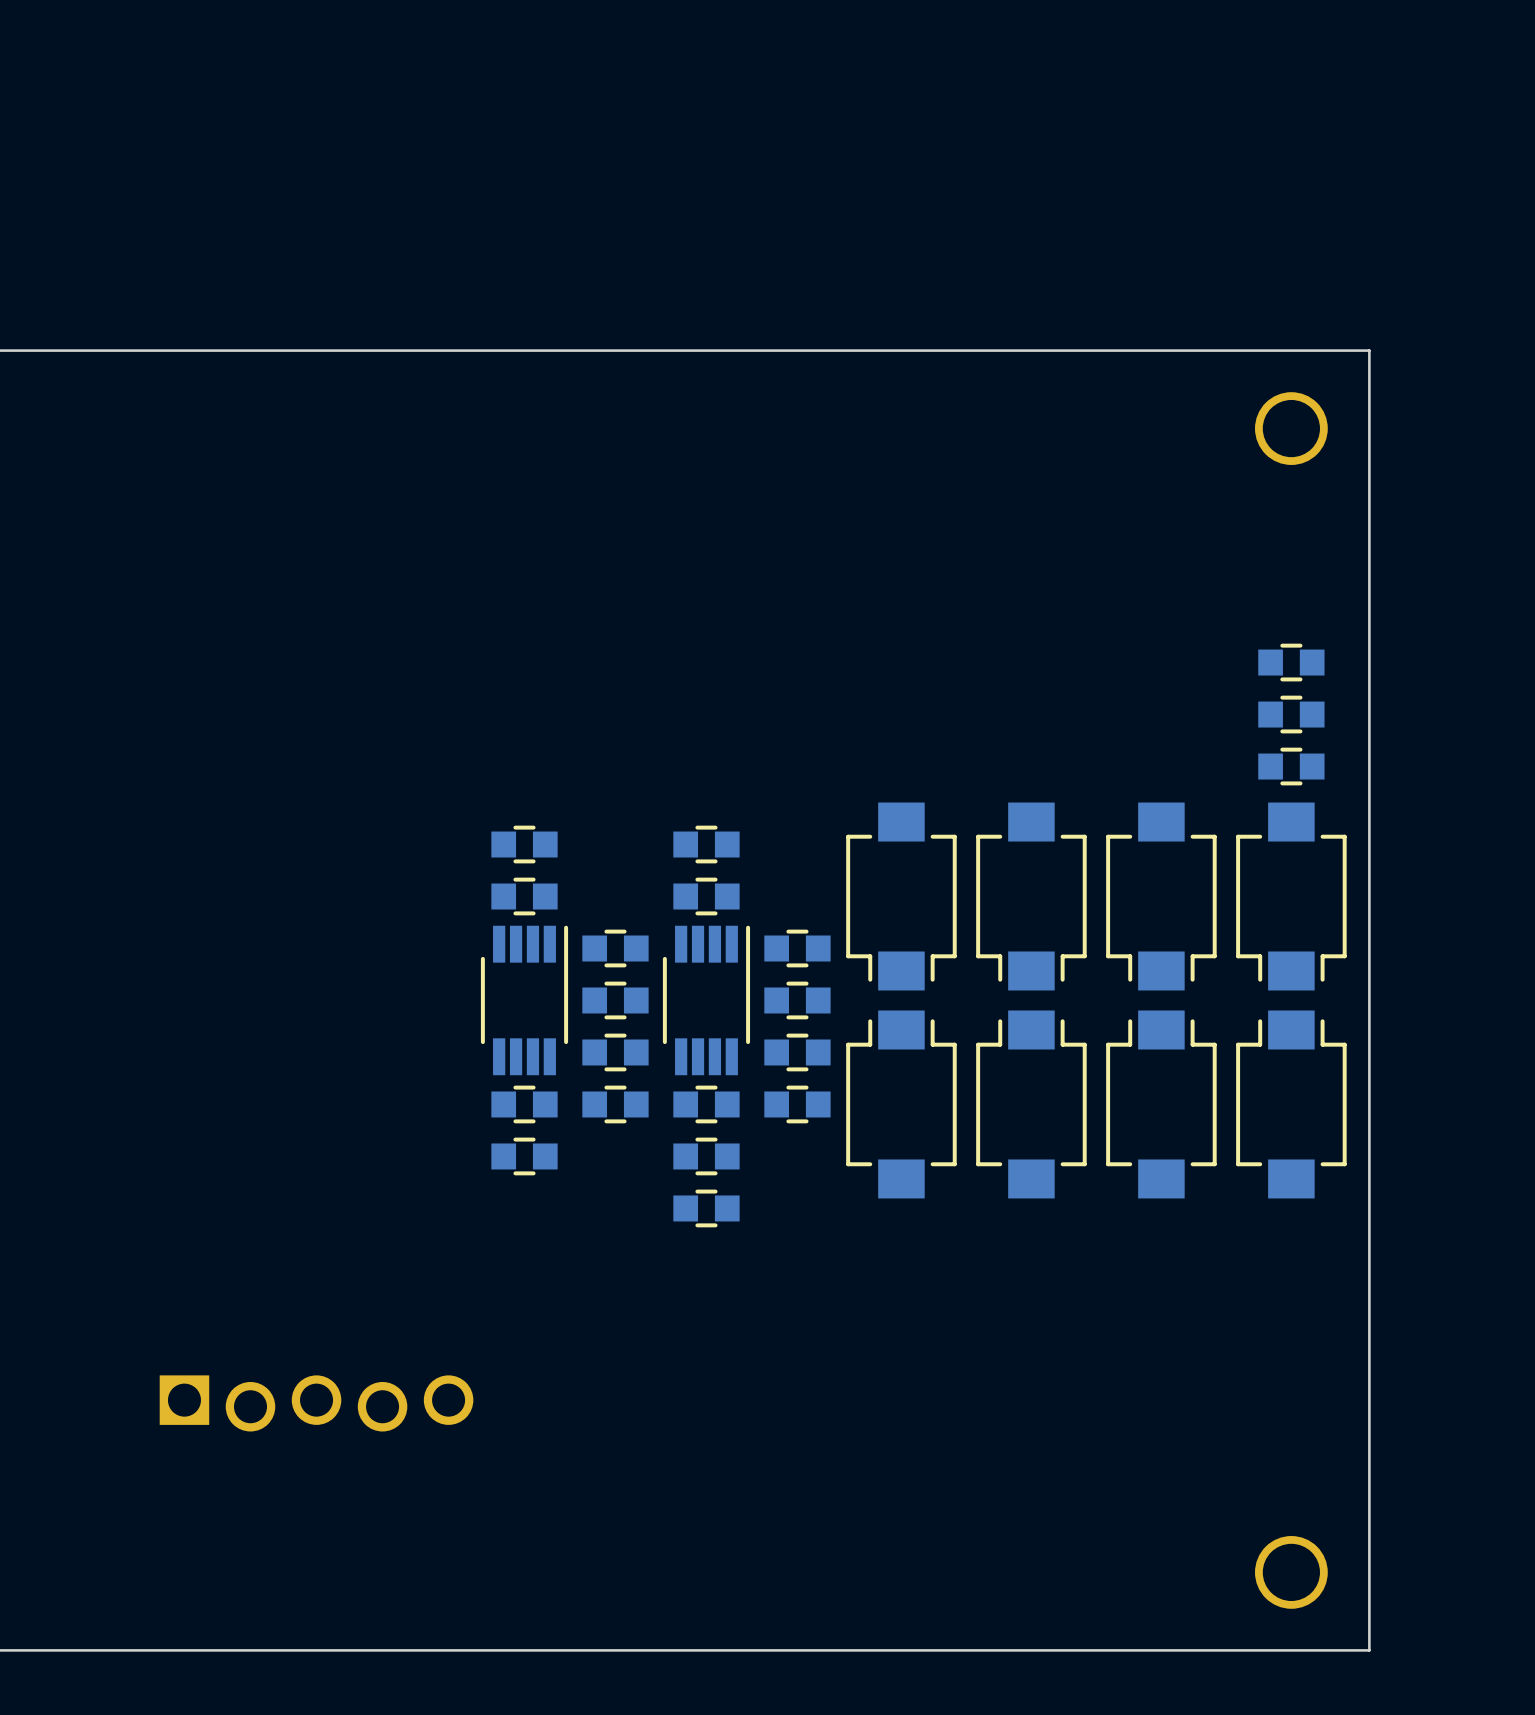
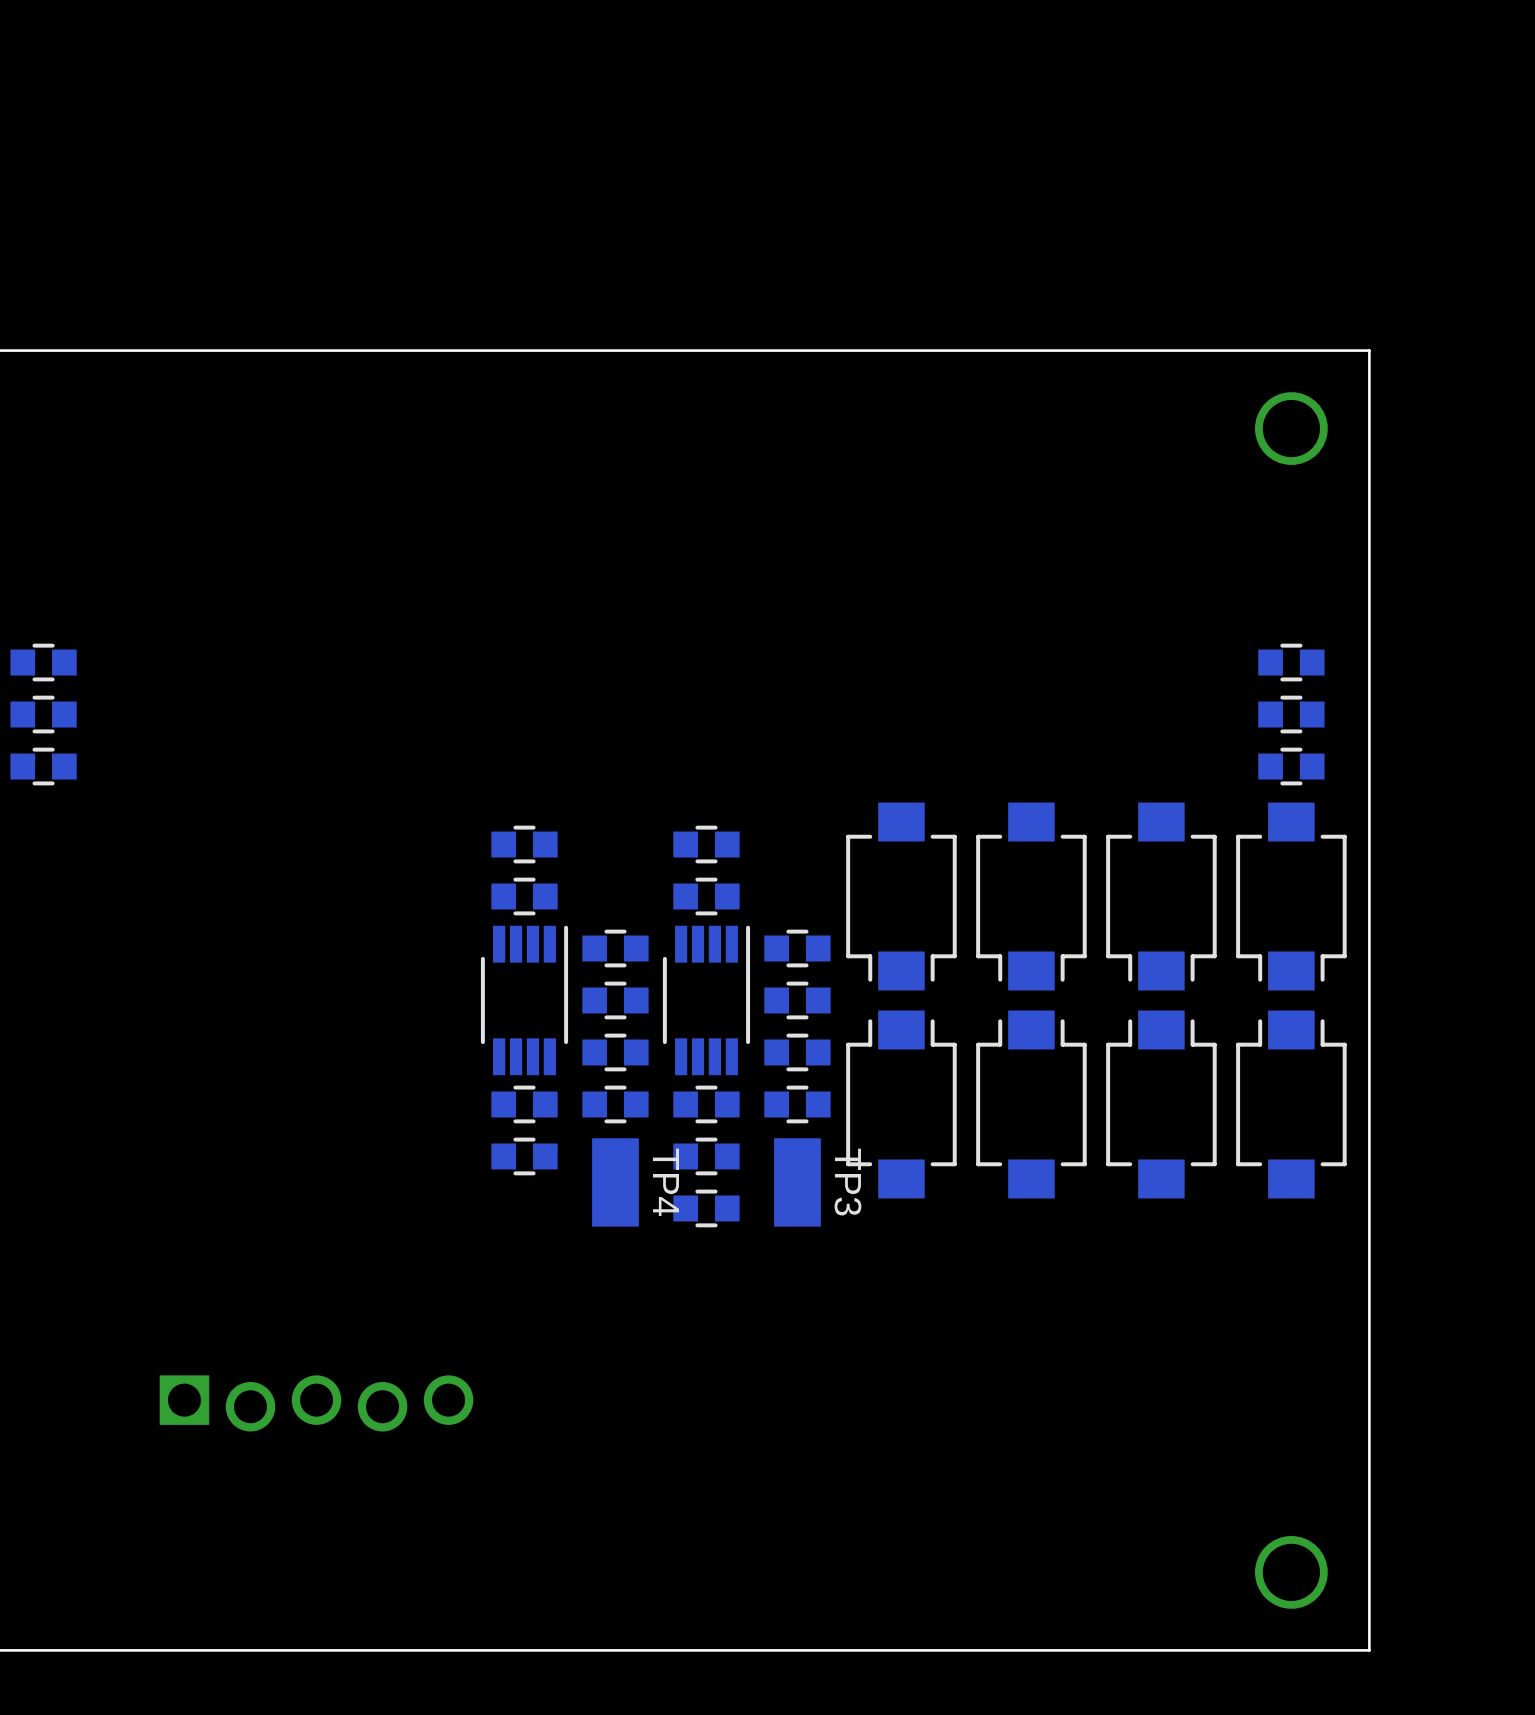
part: none -> (43, 662)
part: none -> (43, 714)
part: none -> (43, 766)
TP4: none -> (615, 1182)
TP3: none -> (797, 1182)

